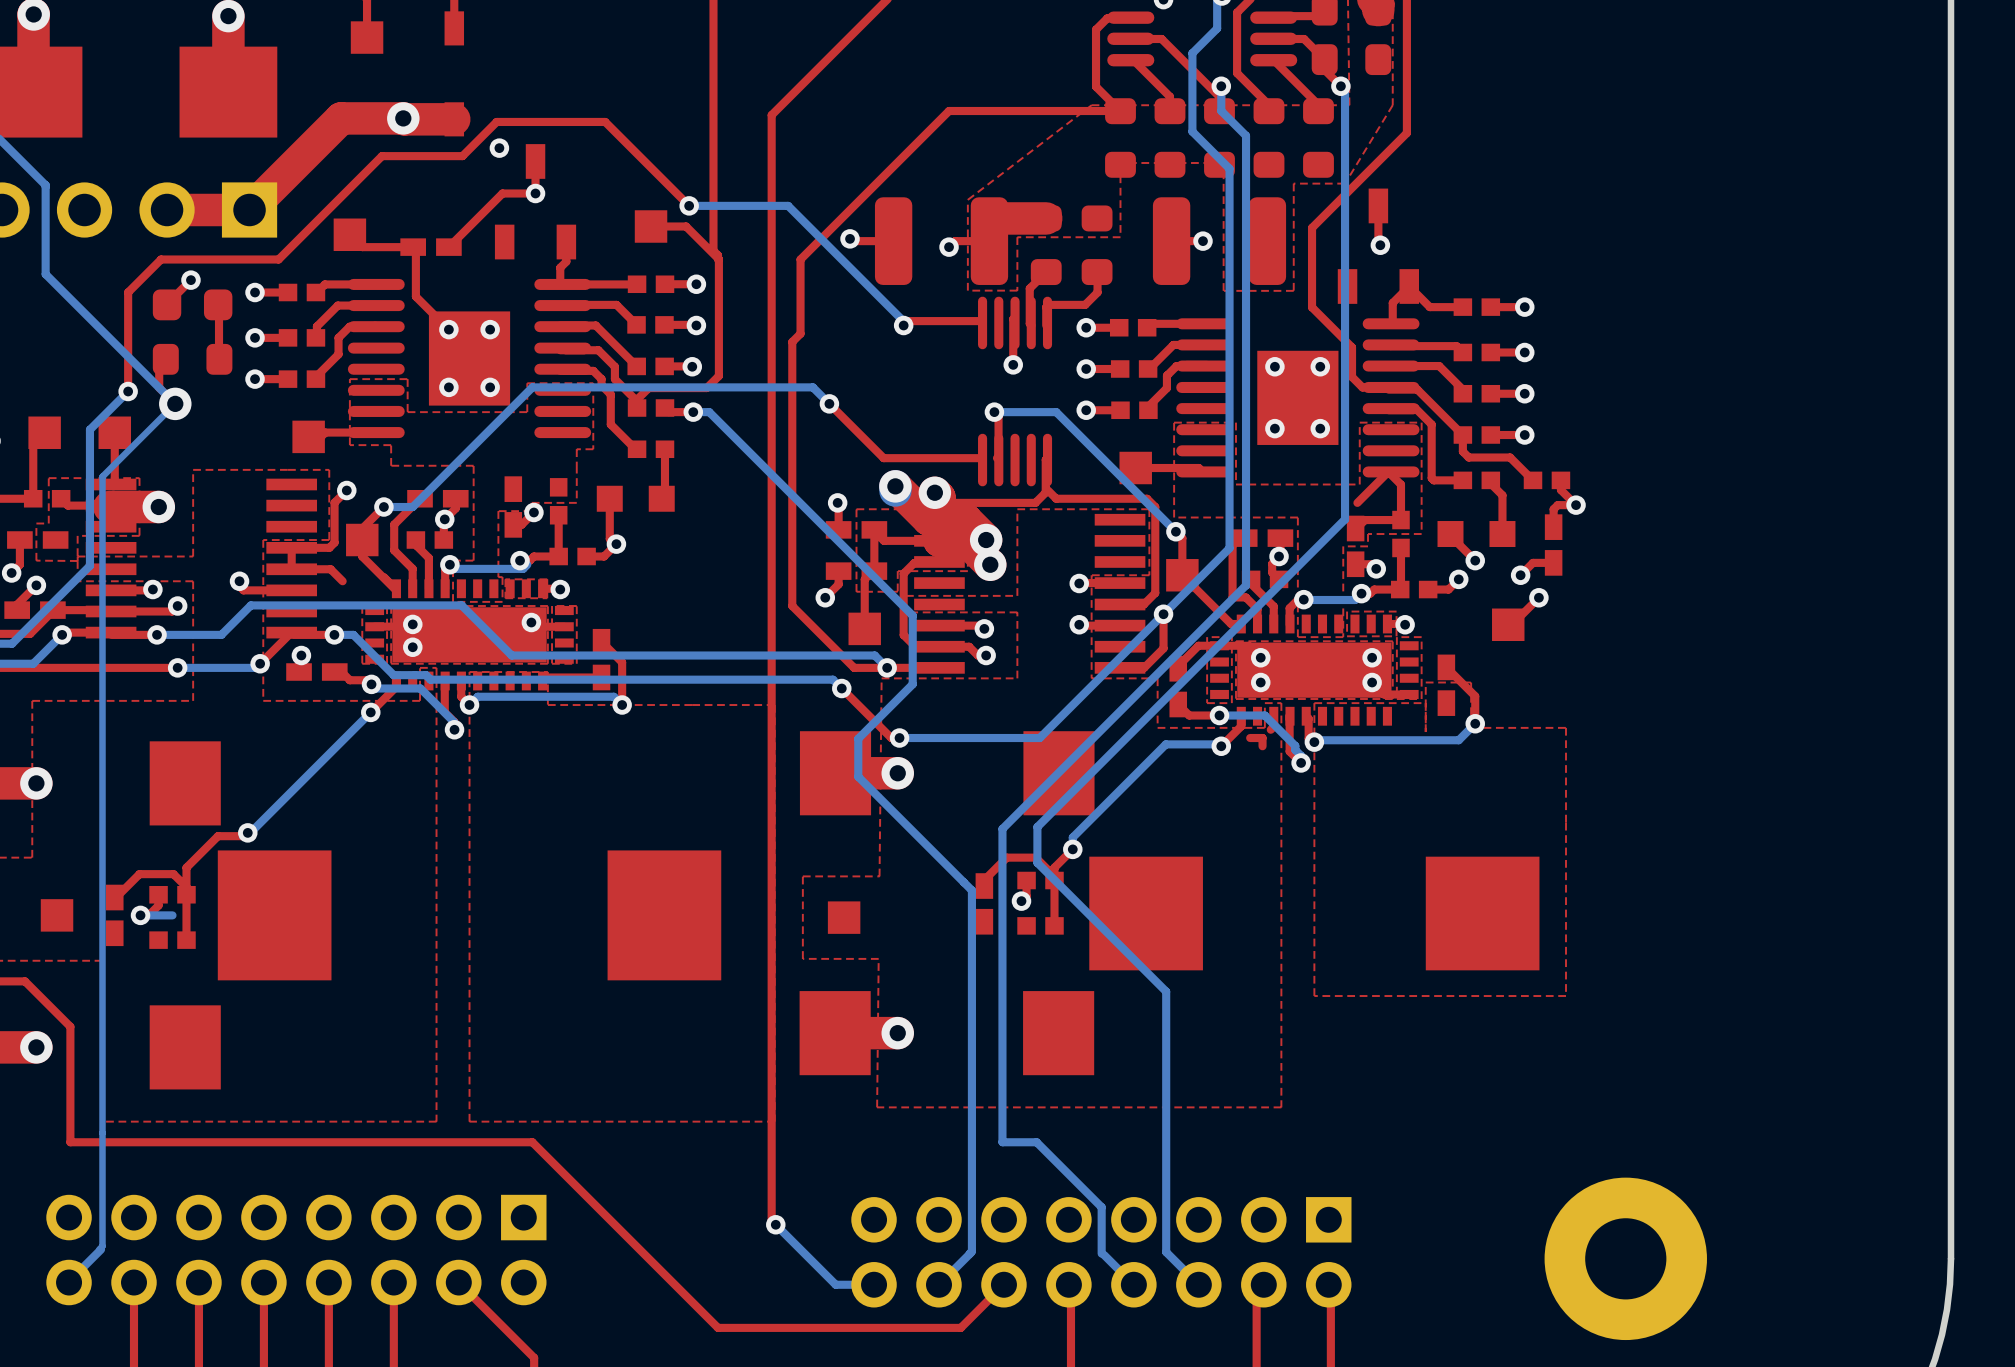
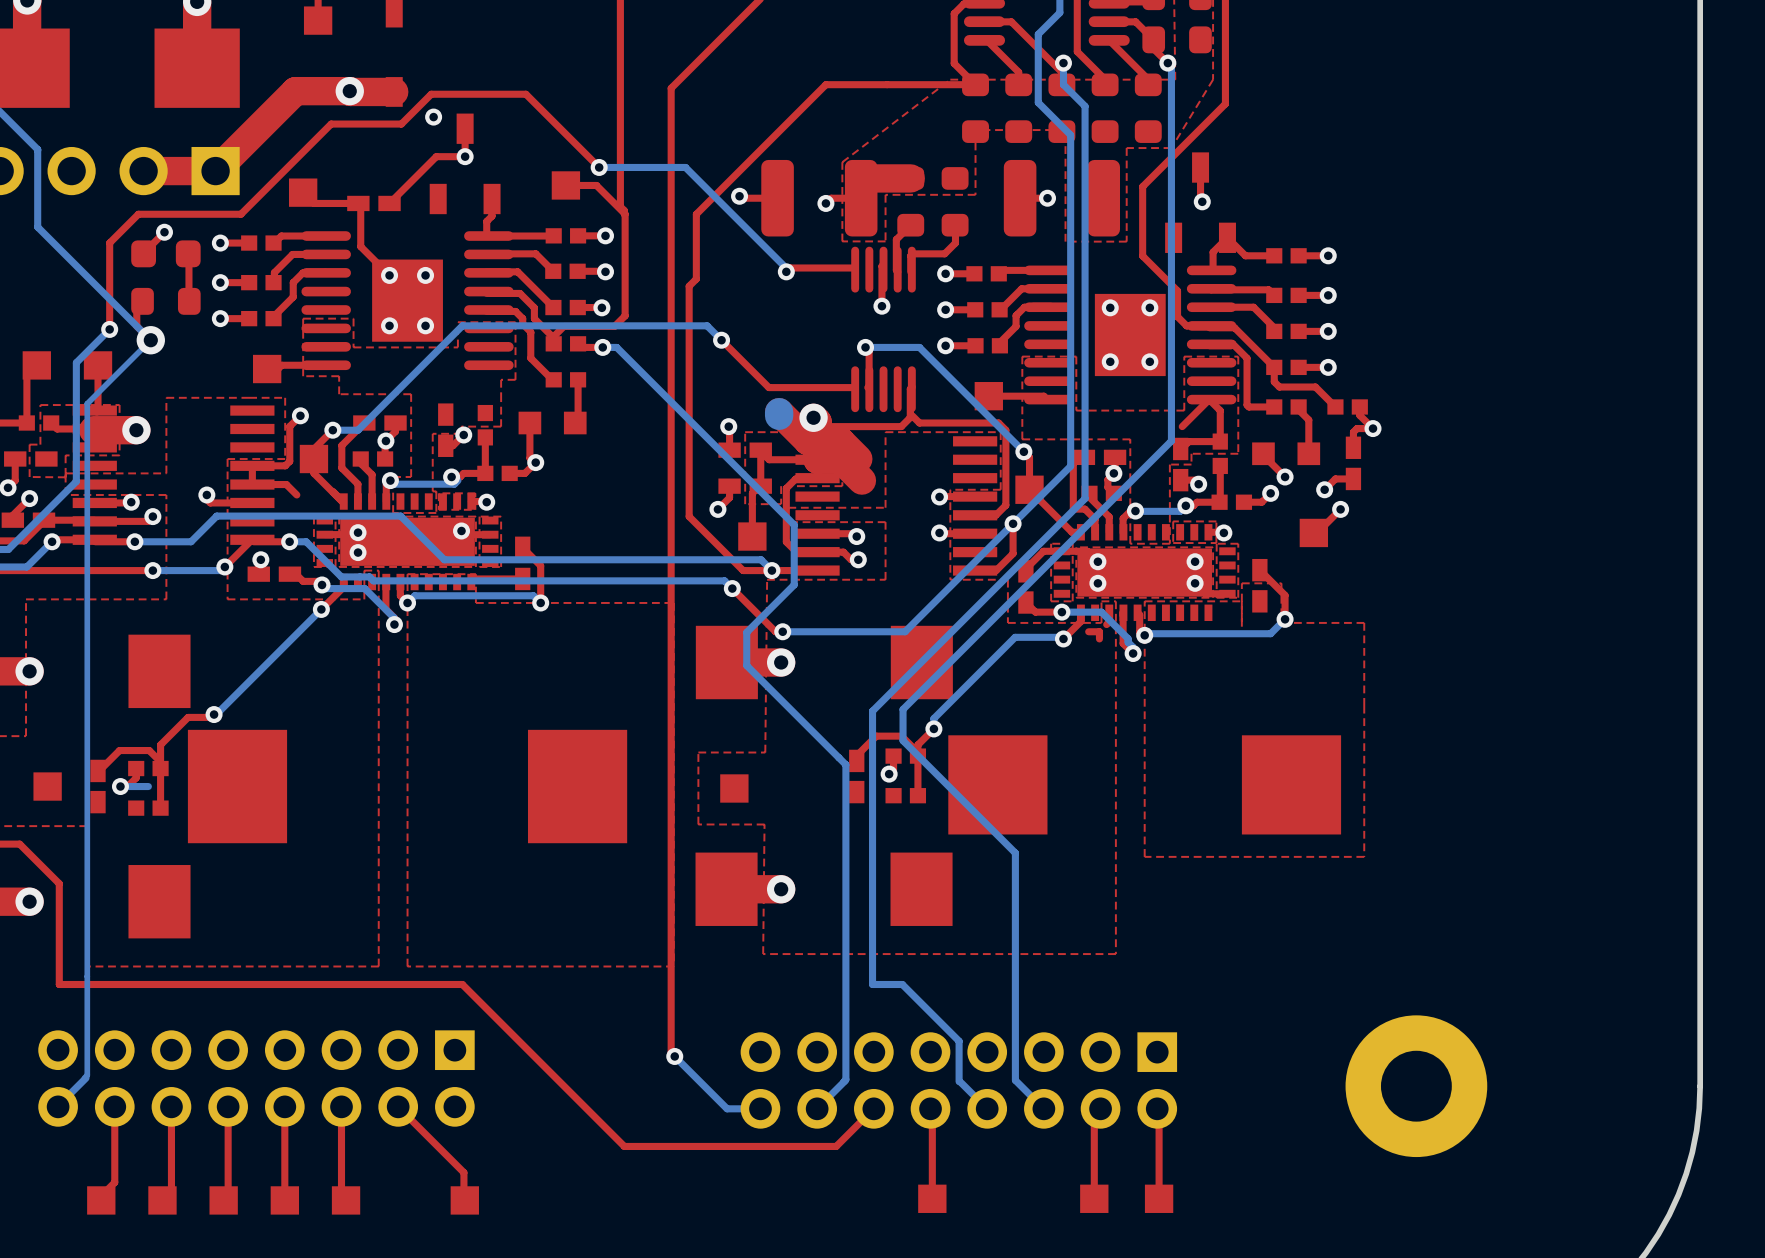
via: (895, 486) -> none
via: (986, 540) -> none
via: (990, 564) -> none

